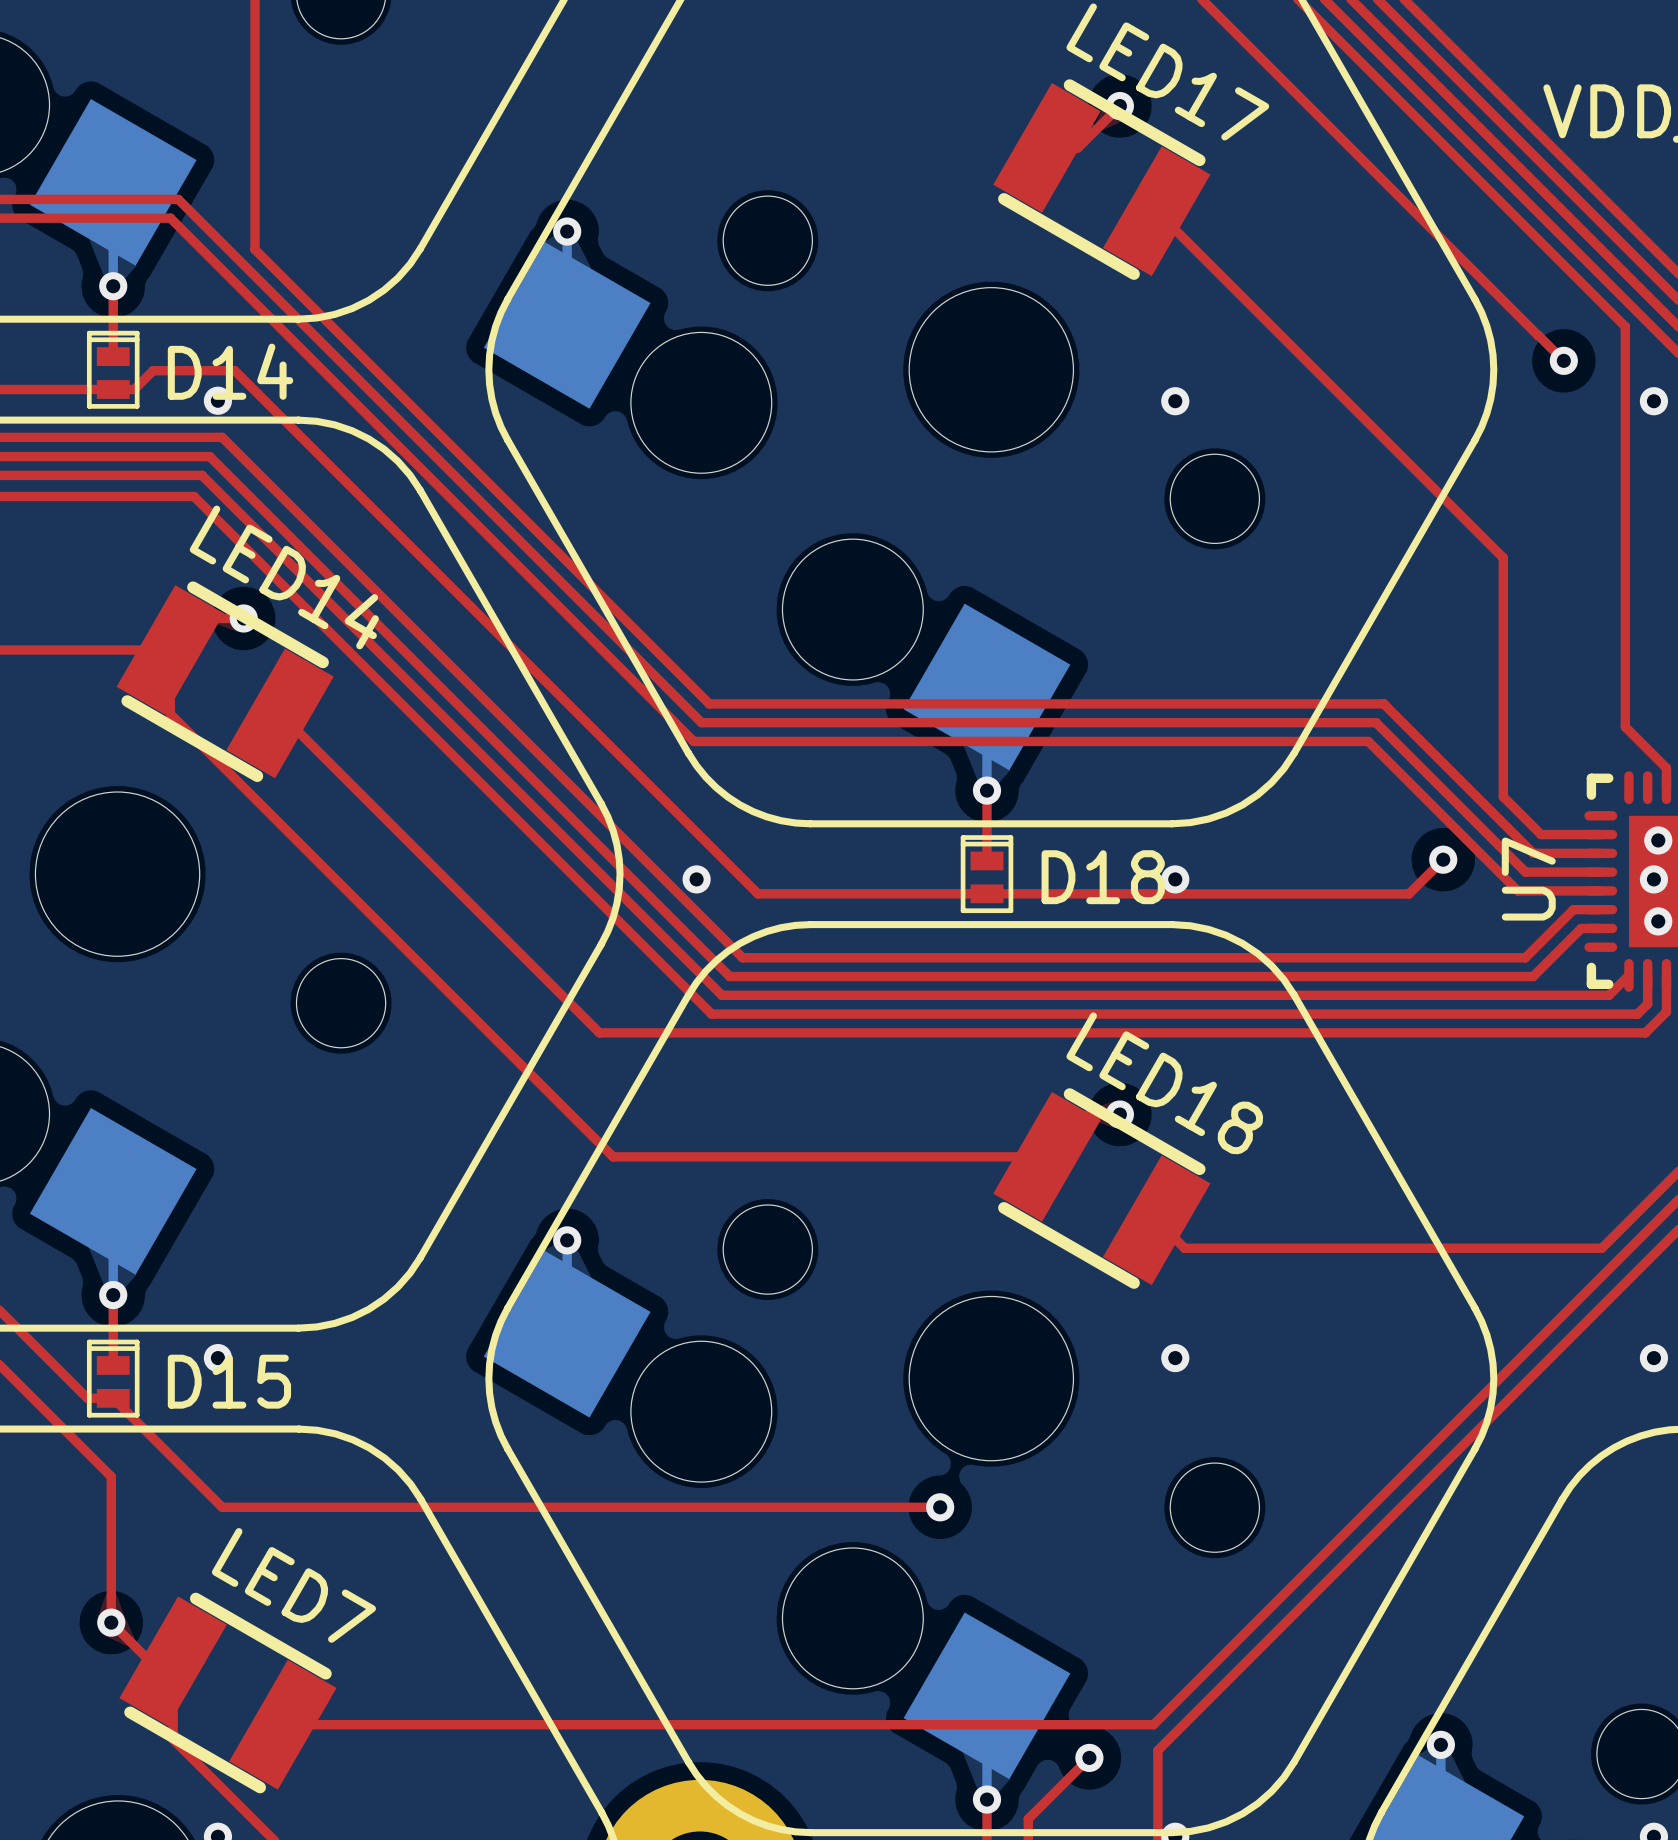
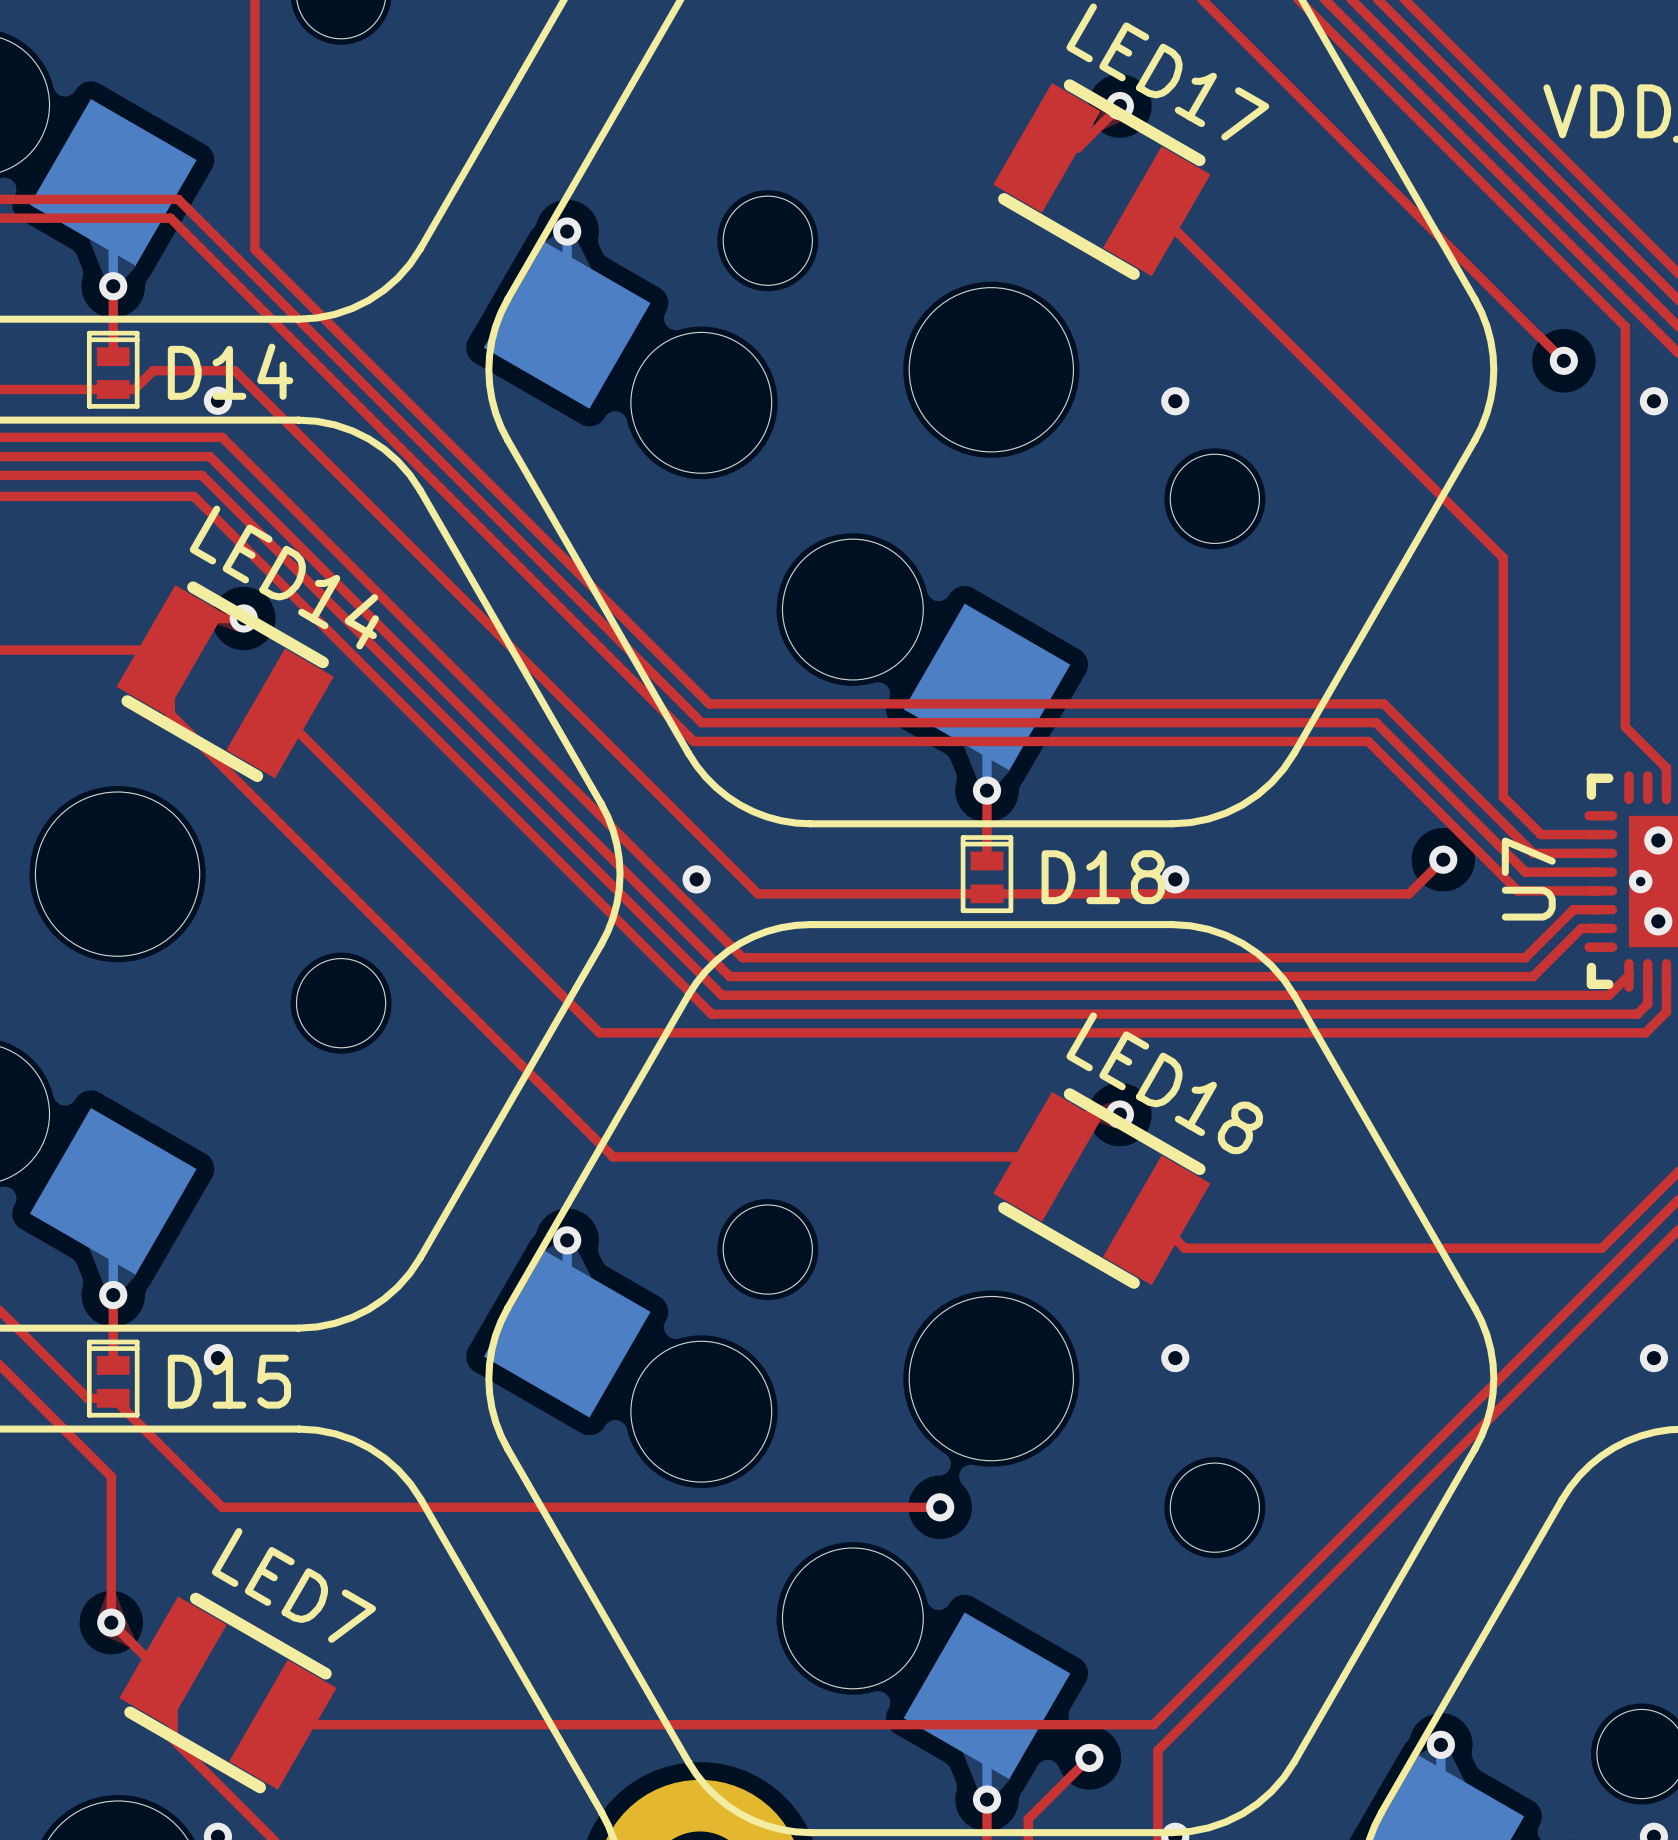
via position: (1653, 879) -> (1640, 881)

